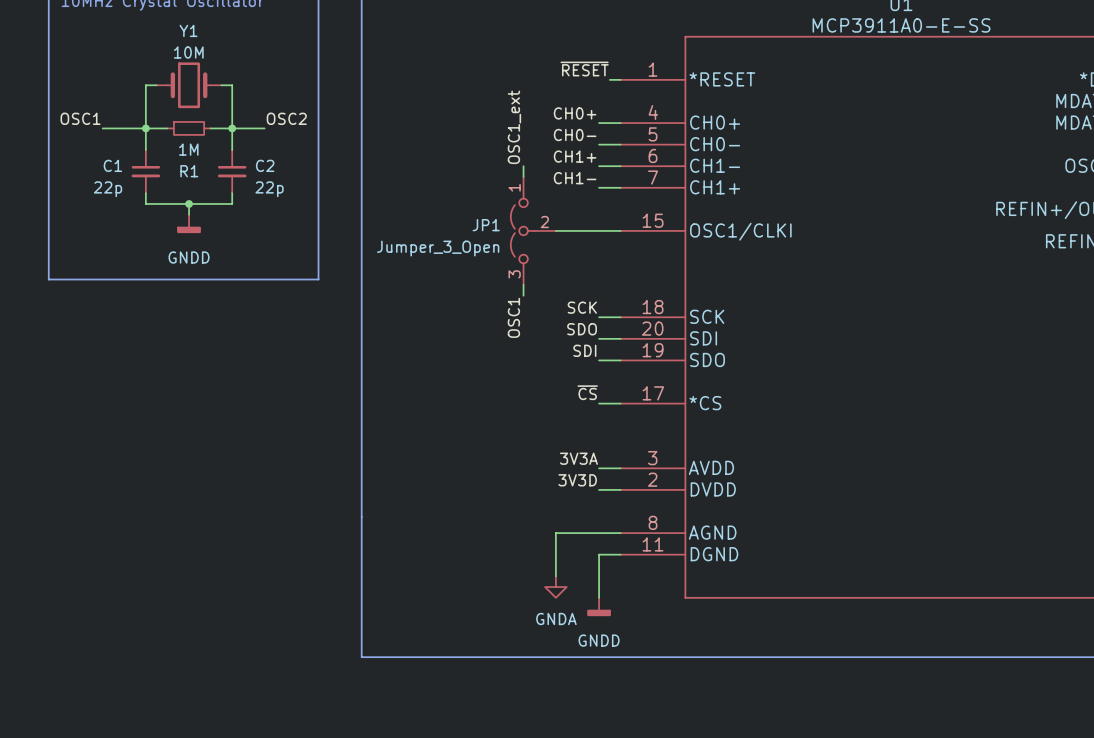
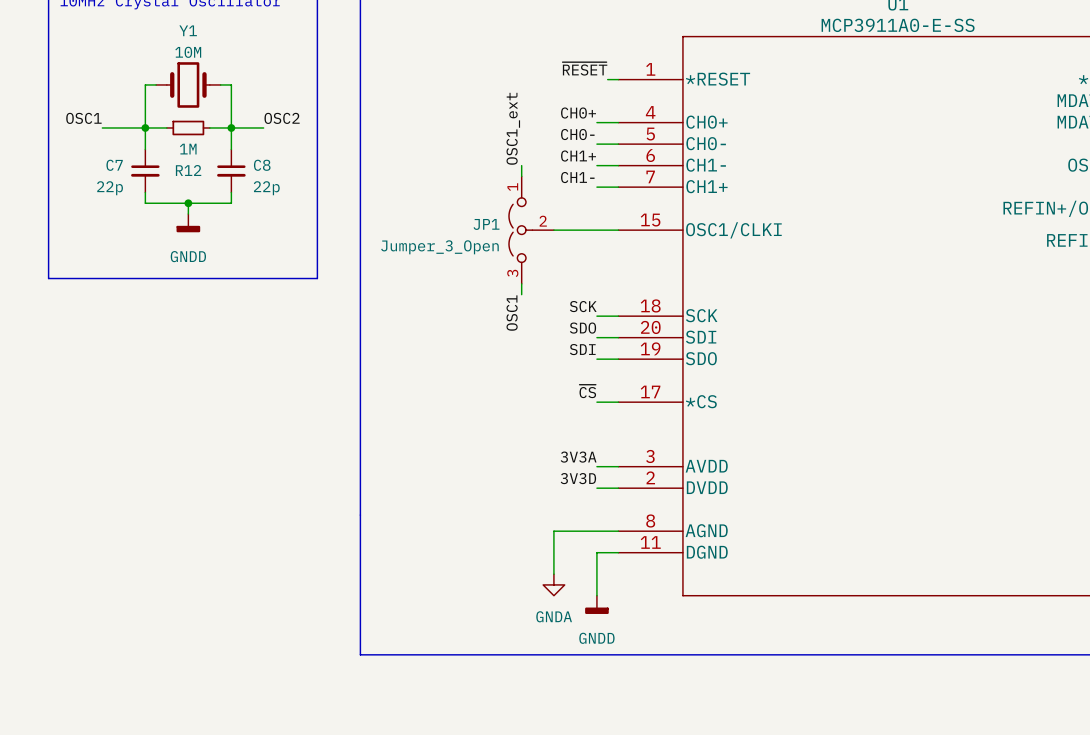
C1 name: C1 (112, 165) -> C7 (114, 165)
C2 name: C2 (265, 165) -> C8 (262, 165)
R1 name: R1 (189, 171) -> R12 (188, 170)

